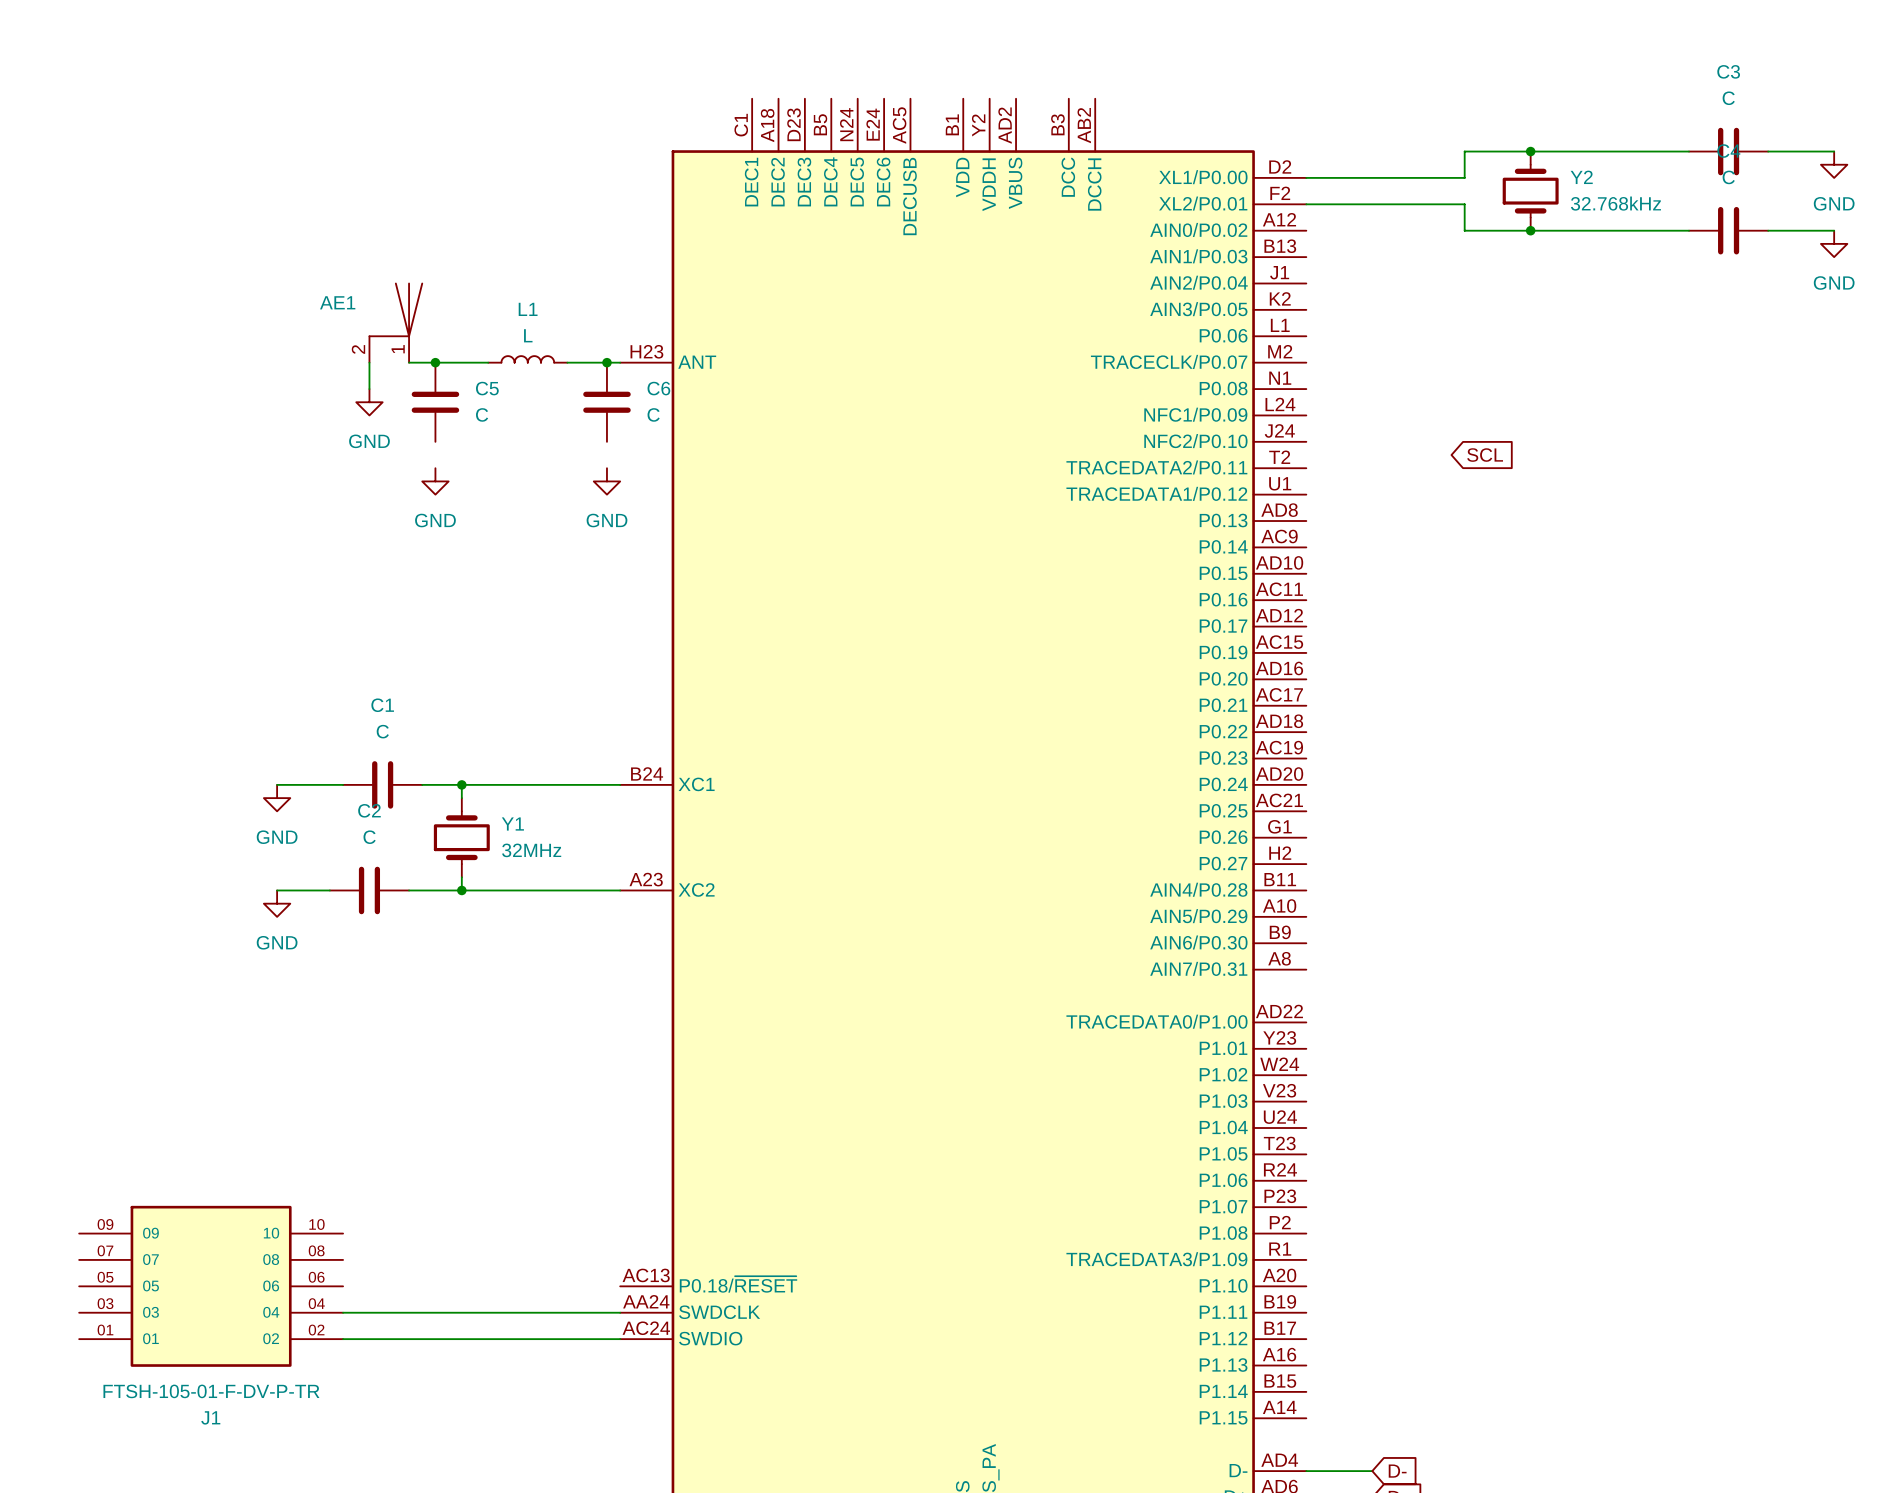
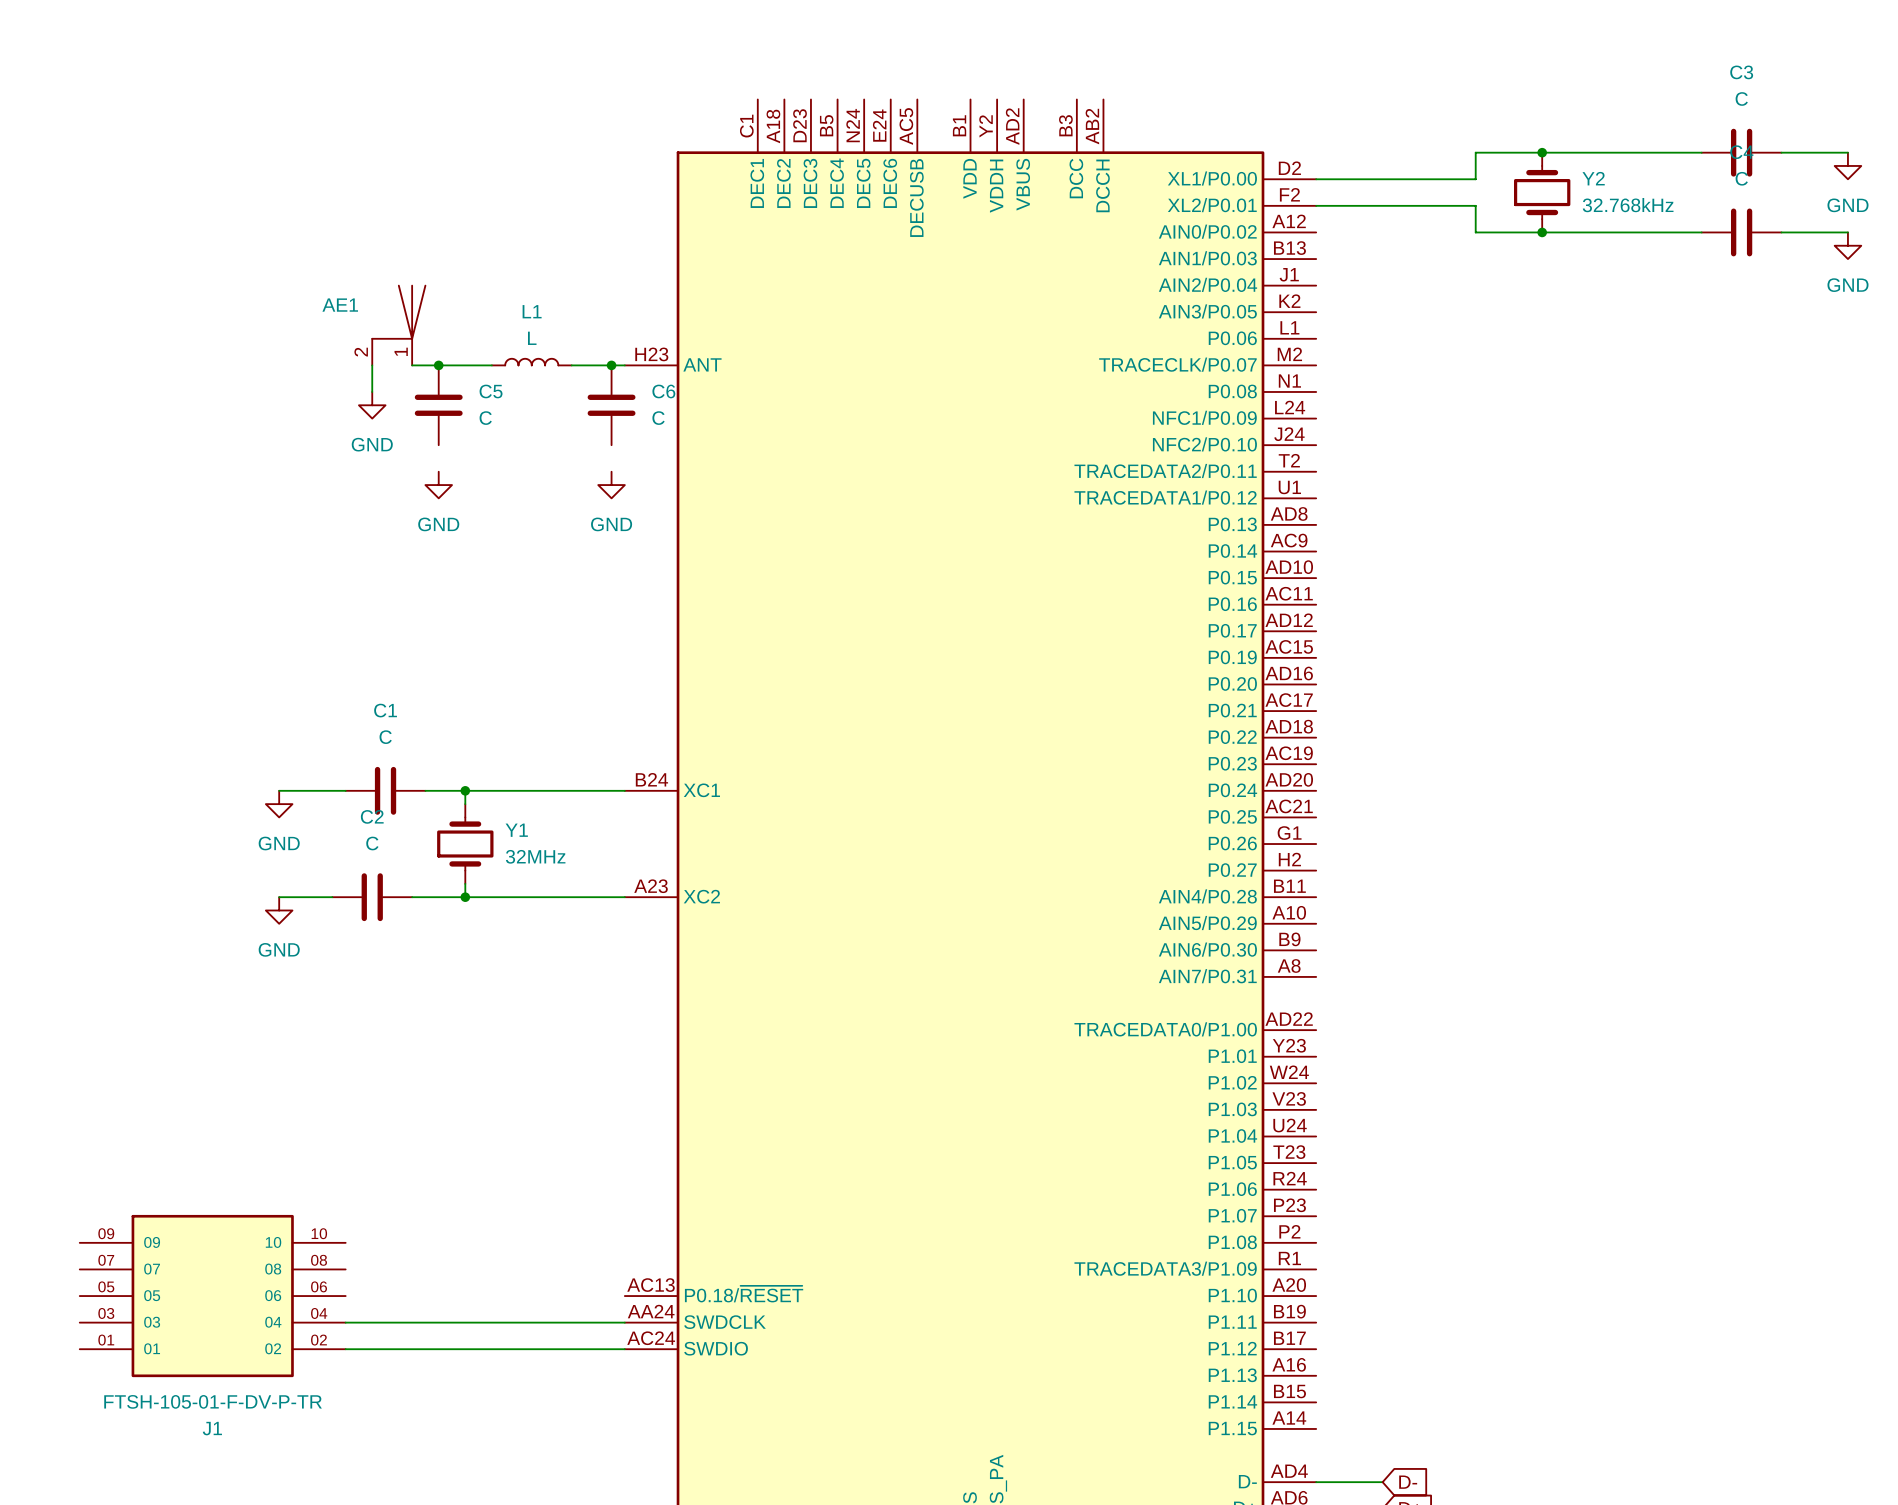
global label: SCL (1485, 455) -> none

